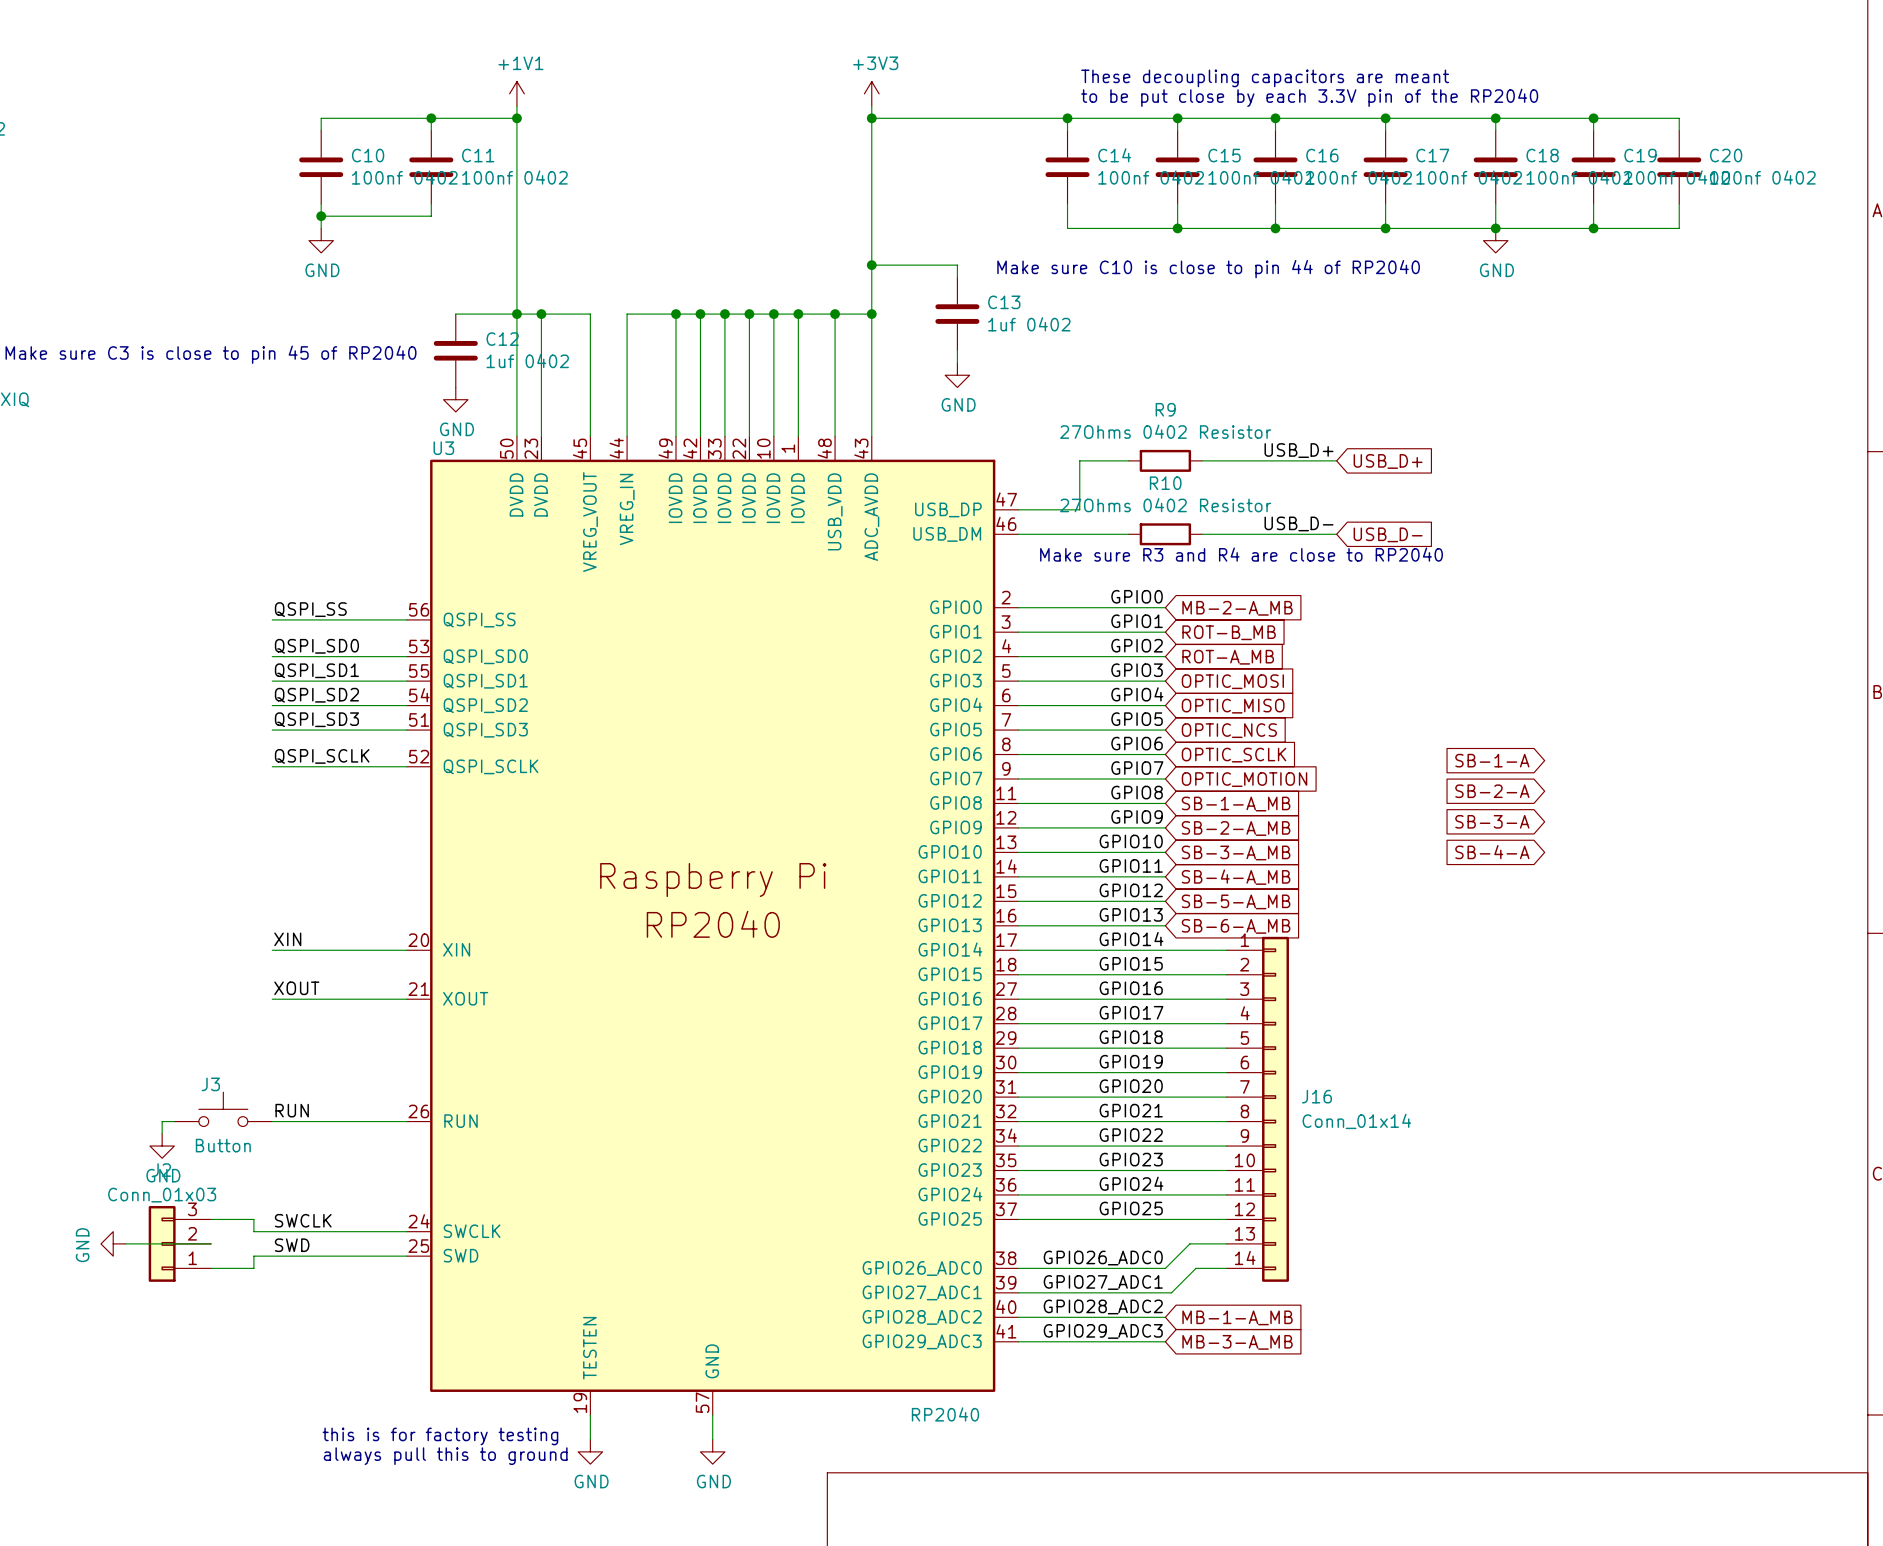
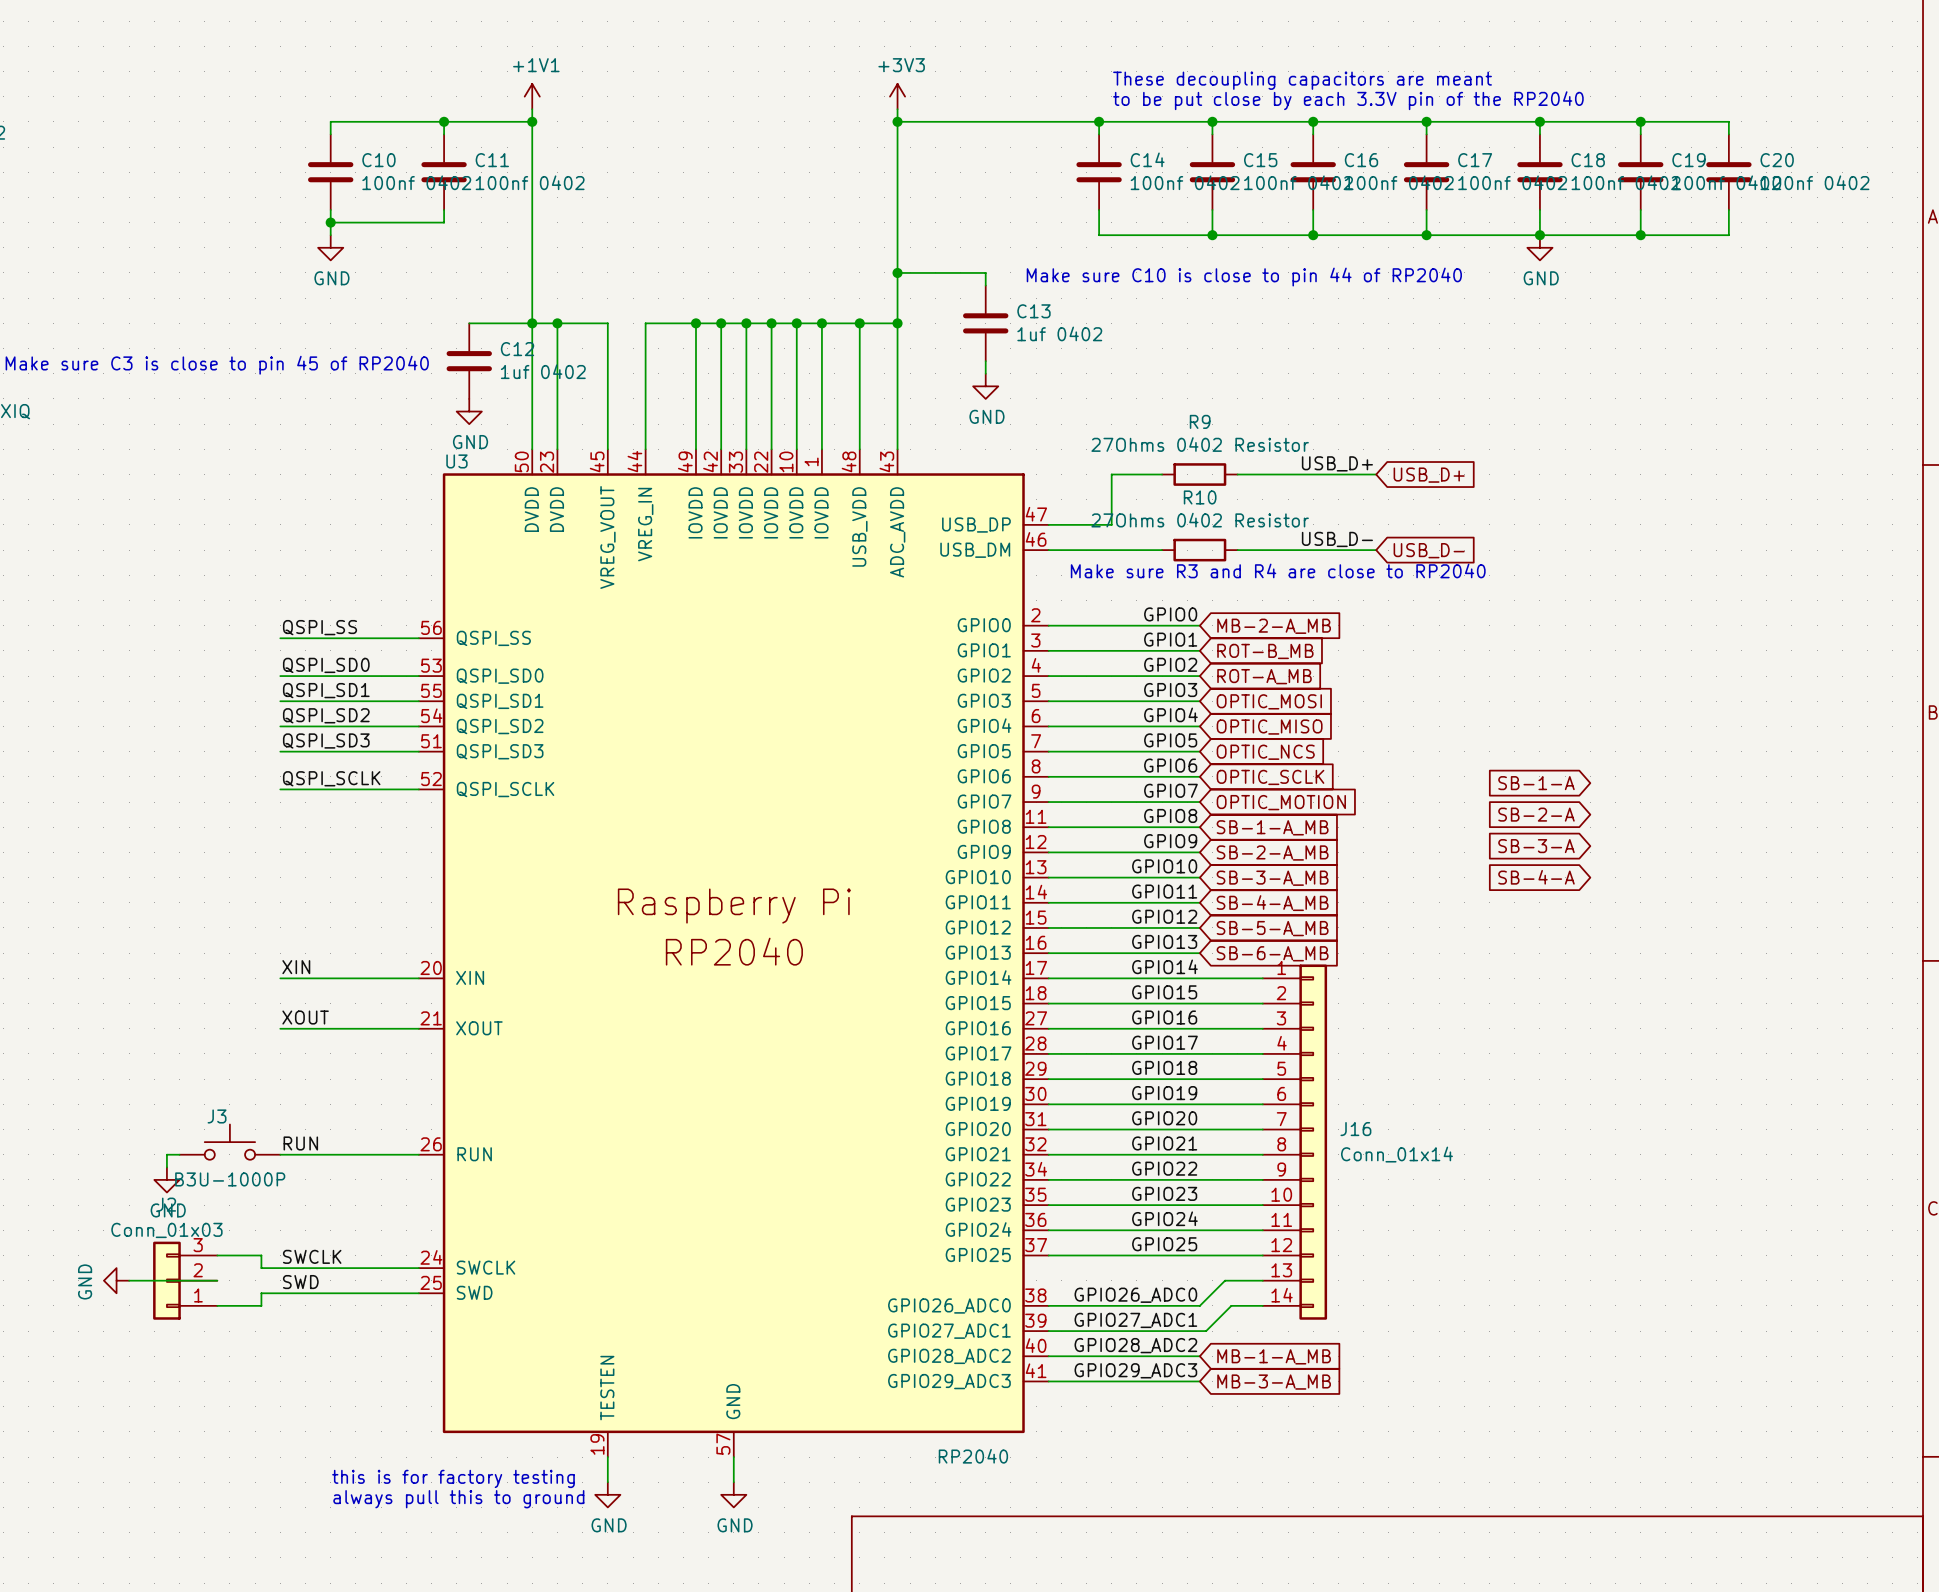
J3 value: Button (223, 1145) -> B3U-1000P (230, 1179)

